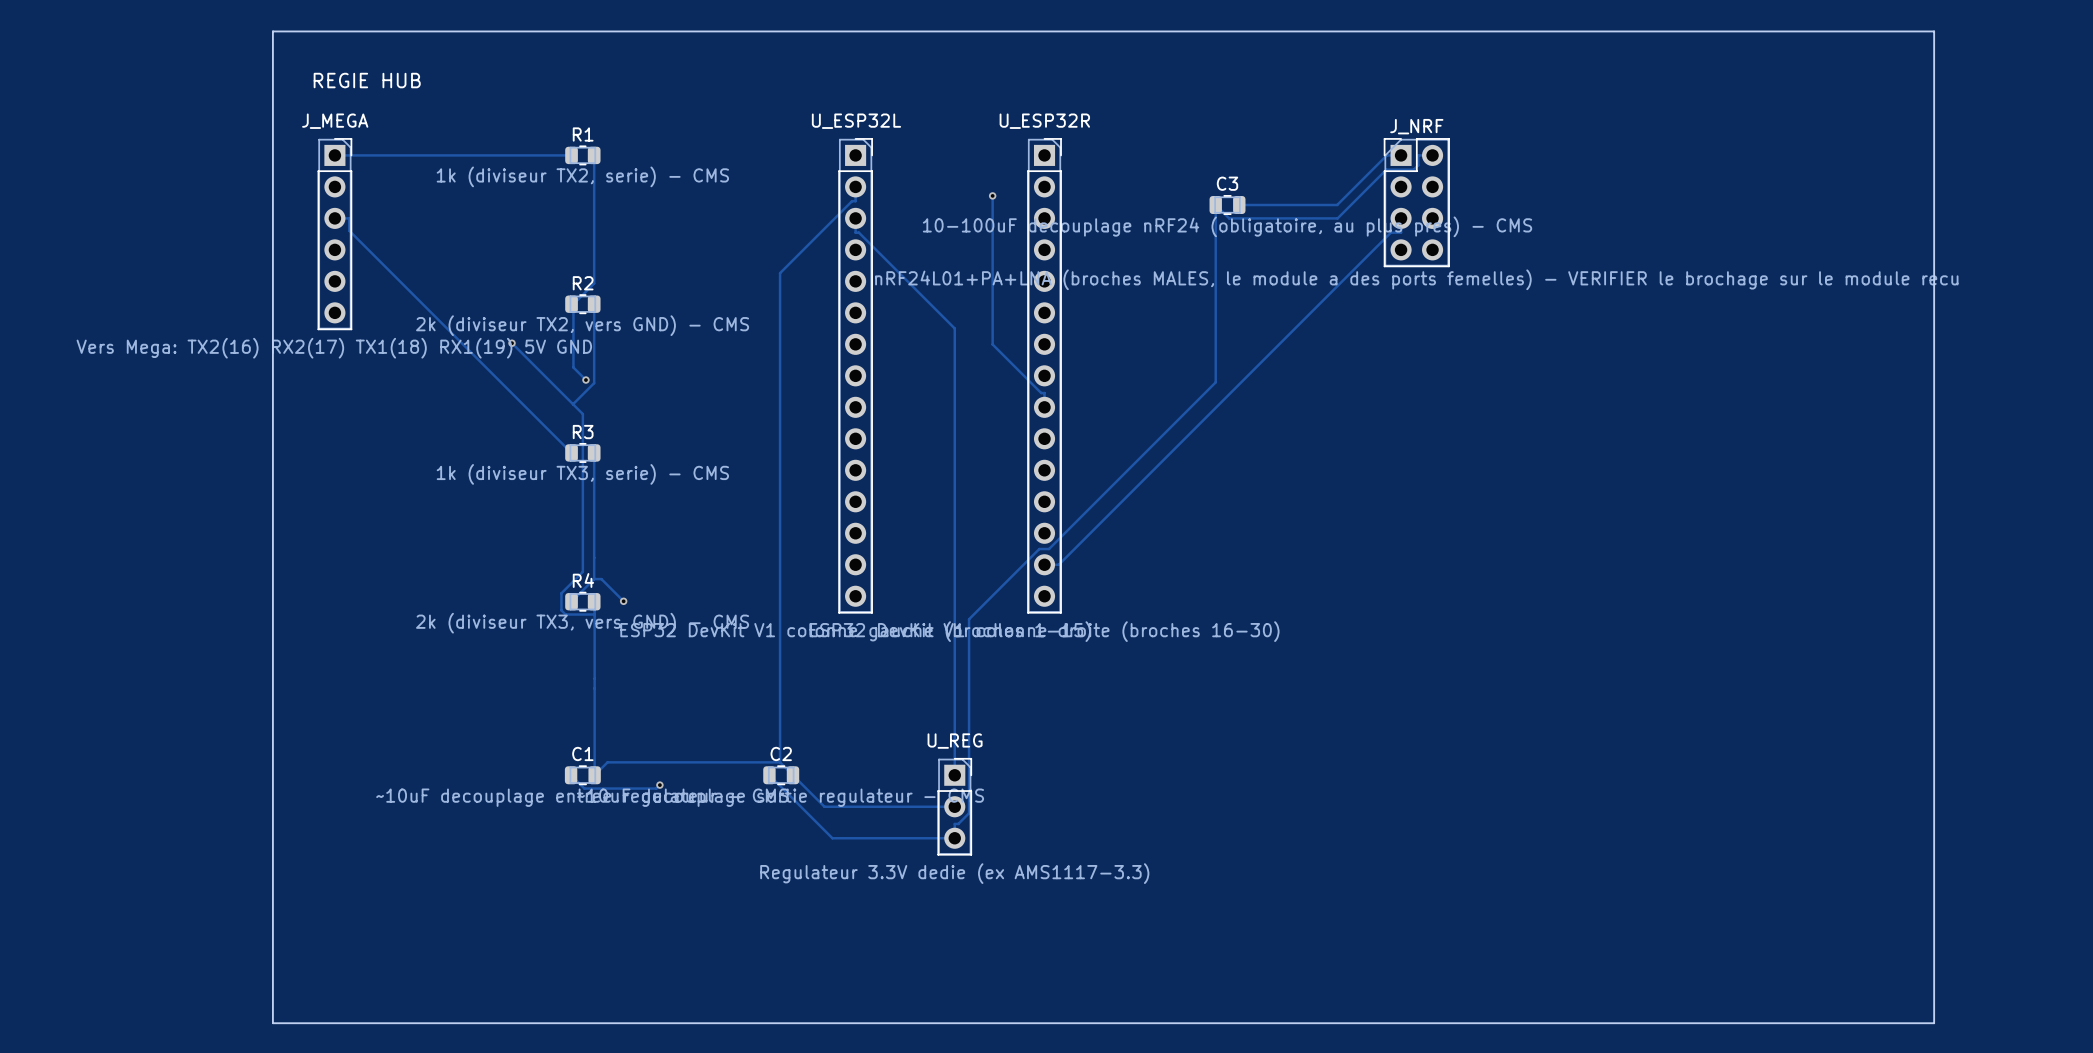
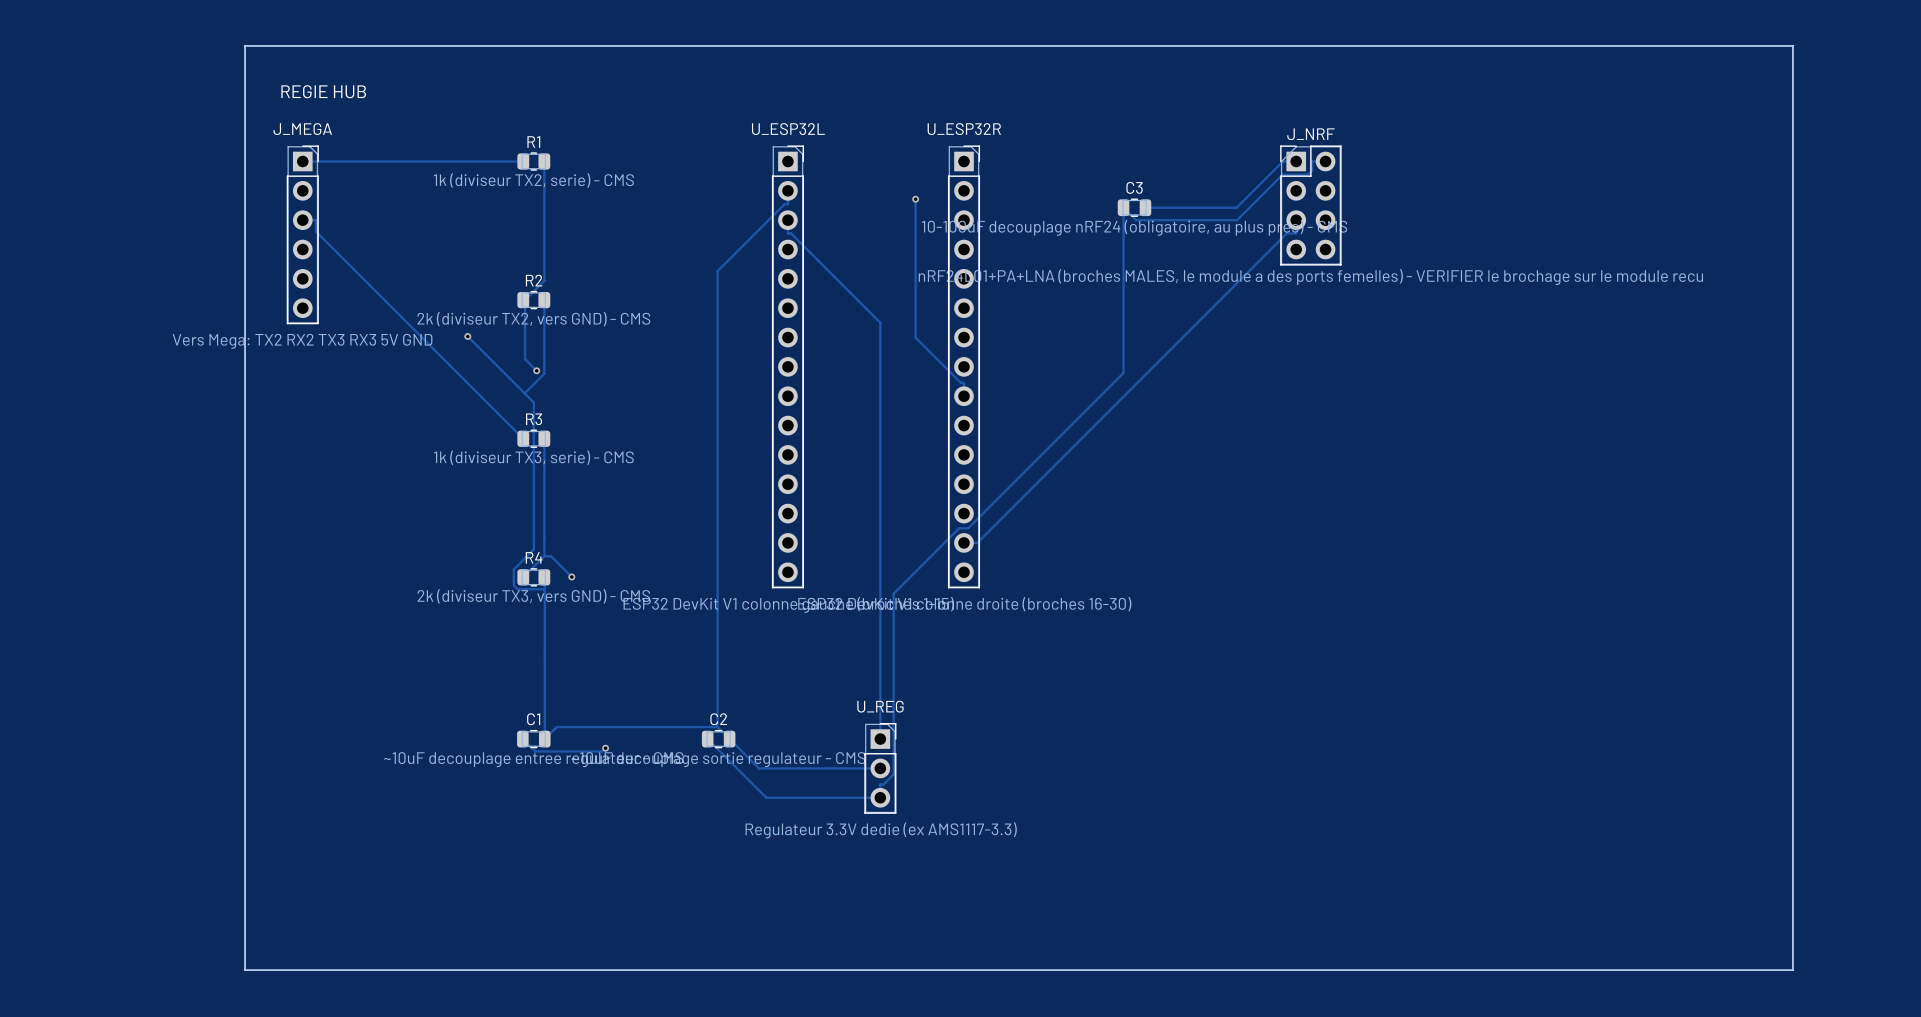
J_MEGA value: Vers Mega: TX2(16) RX2(17) TX1(18) RX1(19) 5V GND (334, 348) -> Vers Mega: TX2 RX2 TX3 RX3 5V GND (302, 341)

